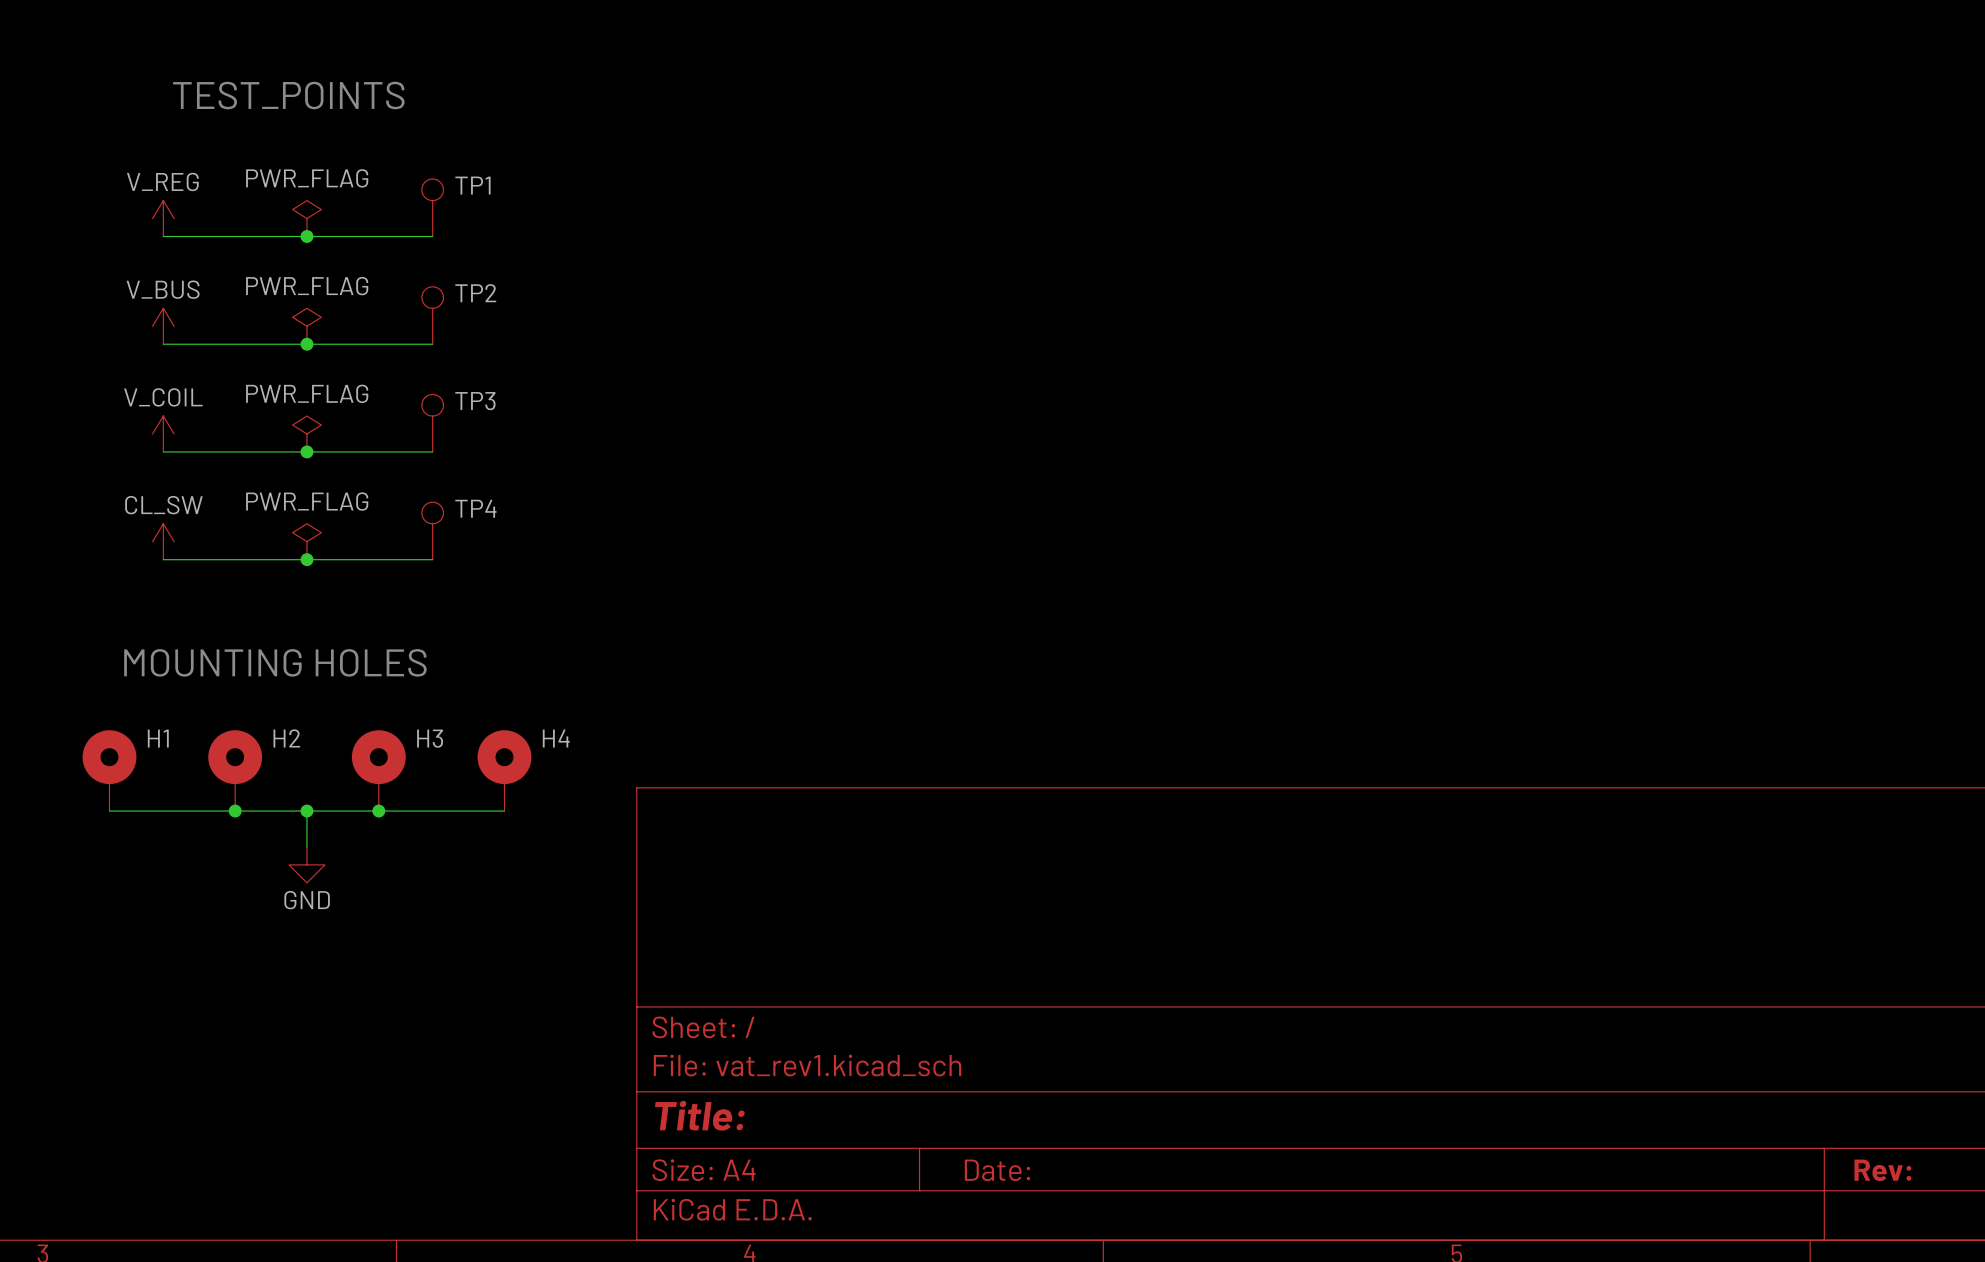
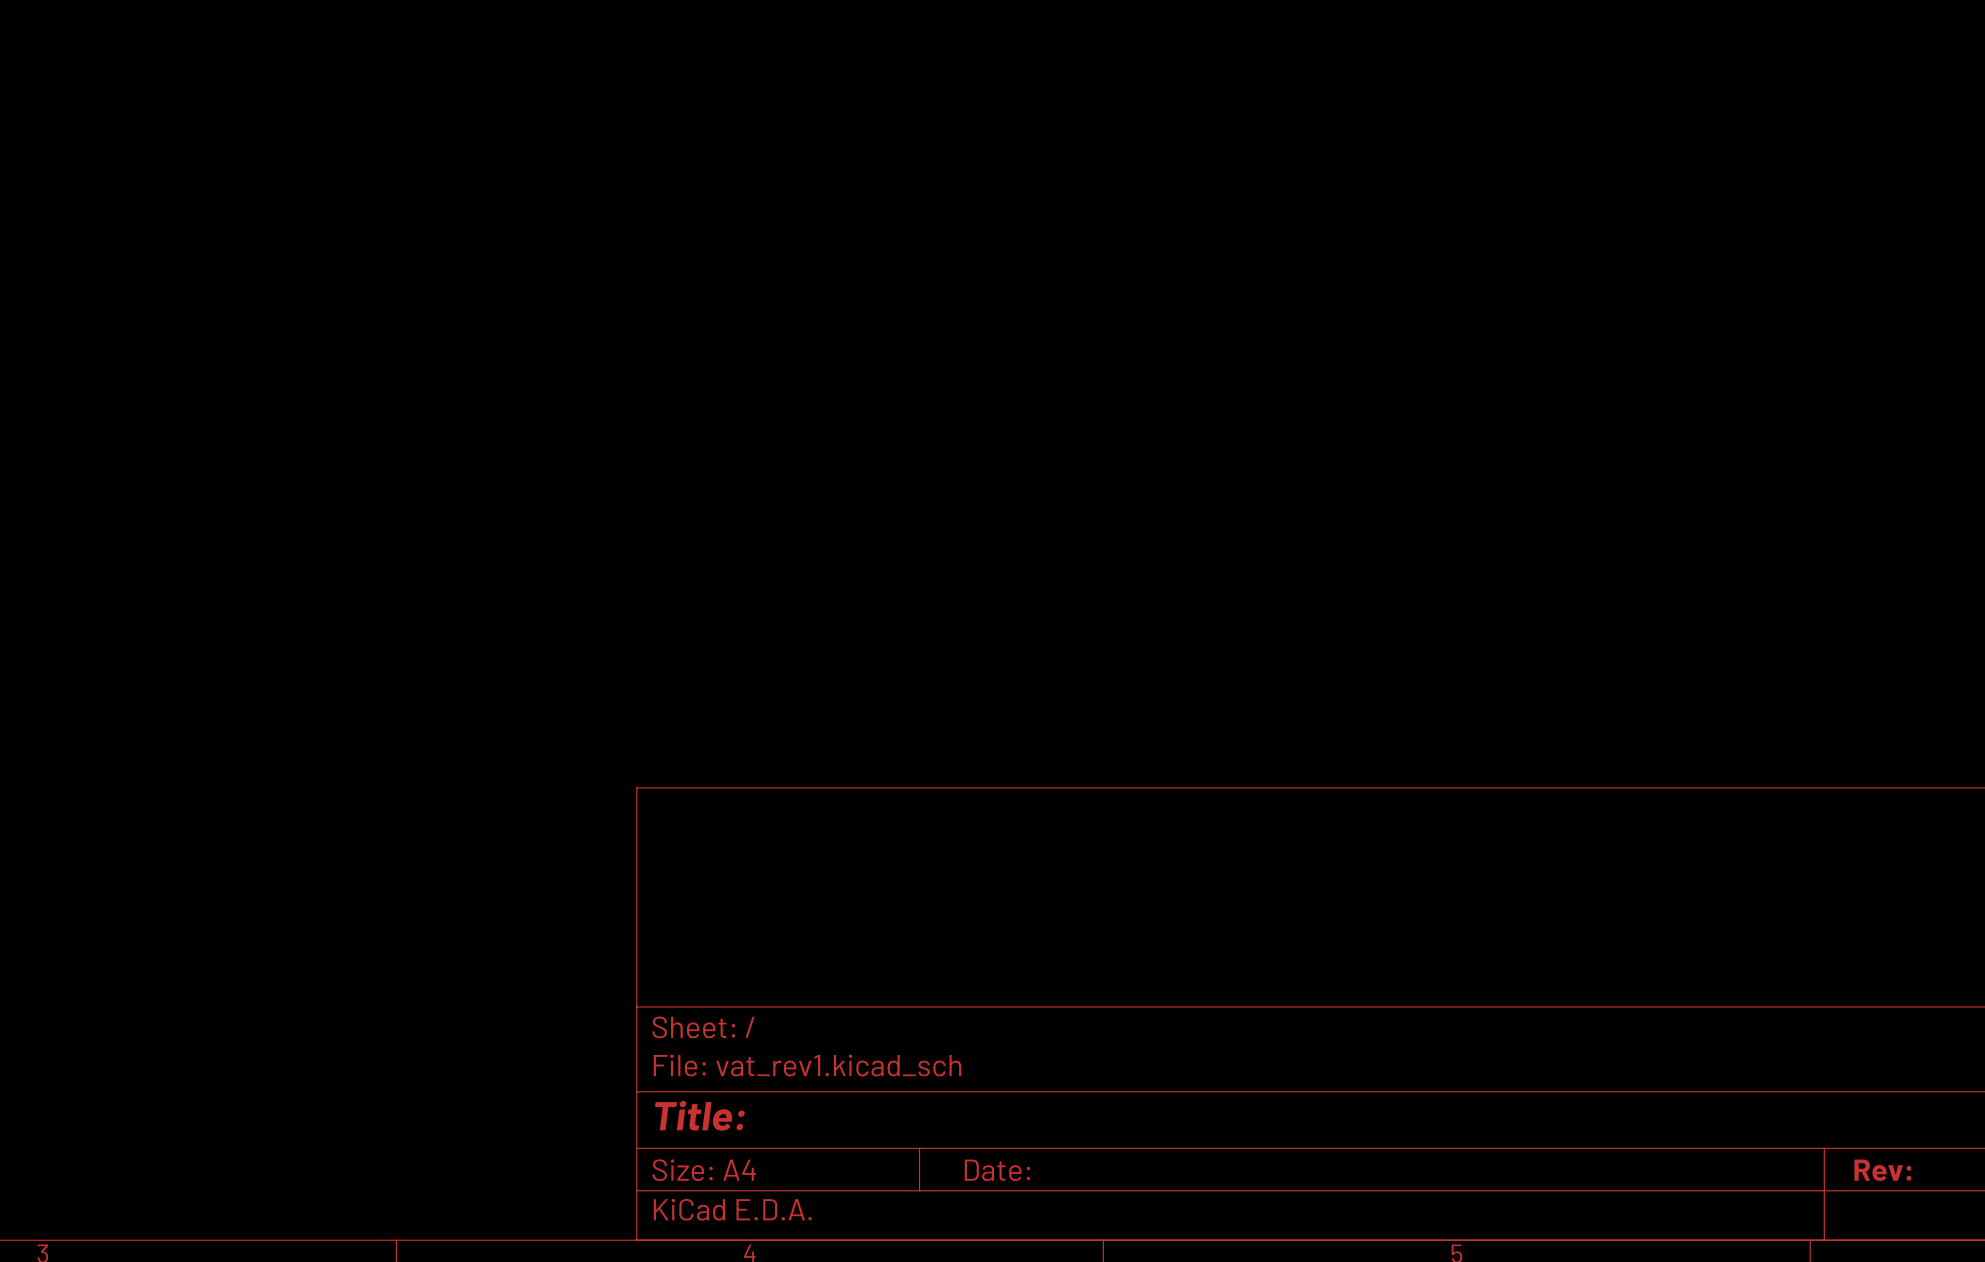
text: TEST_POINTS (288, 95) -> none
TP1: (432, 207) -> none
power symbol: V_REG (163, 218) -> none
power symbol: PWR_FLAG (306, 218) -> none
wire: (163, 236) (432, 236) -> none
junction: (306, 236) -> none
TP2: (432, 315) -> none
power symbol: V_BUS (163, 326) -> none
power symbol: PWR_FLAG (306, 326) -> none
wire: (163, 344) (432, 344) -> none
junction: (306, 344) -> none
TP3: (432, 423) -> none
power symbol: V_COIL (163, 434) -> none
power symbol: PWR_FLAG (306, 434) -> none
wire: (163, 451) (432, 451) -> none
junction: (306, 451) -> none
TP4: (432, 530) -> none
power symbol: CL_SW (163, 541) -> none
power symbol: PWR_FLAG (306, 541) -> none
wire: (163, 559) (432, 559) -> none
junction: (306, 559) -> none
text: MOUNTING HOLES (275, 662) -> none
H1: (109, 770) -> none
H2: (235, 770) -> none
H3: (378, 770) -> none
H4: (504, 770) -> none
wire: (109, 811) (504, 811) -> none
junction: (235, 811) -> none
wire: (306, 811) (306, 846) -> none
junction: (306, 811) -> none
junction: (378, 811) -> none
power symbol: GND (306, 864) -> none

